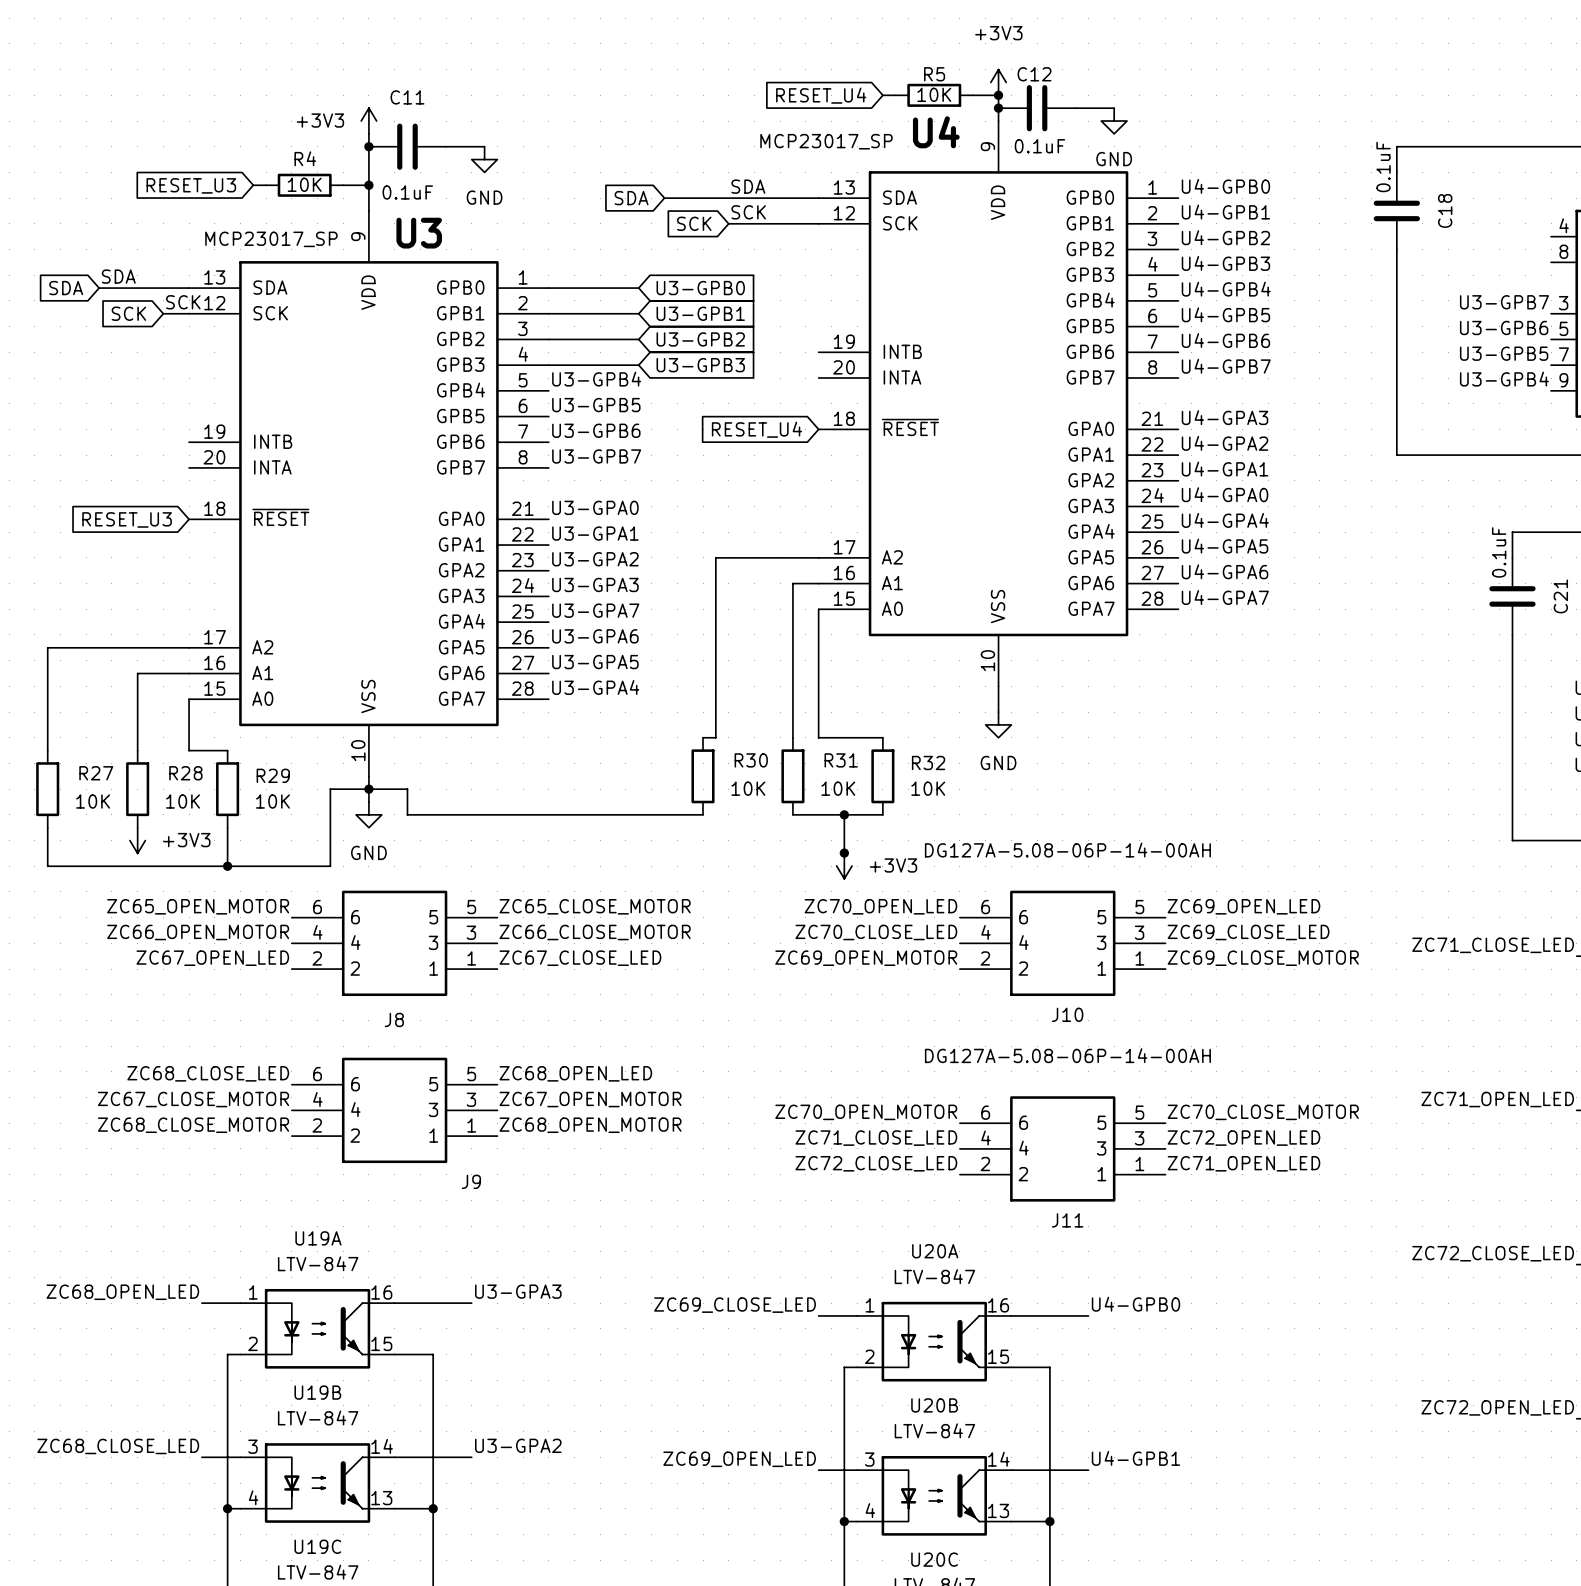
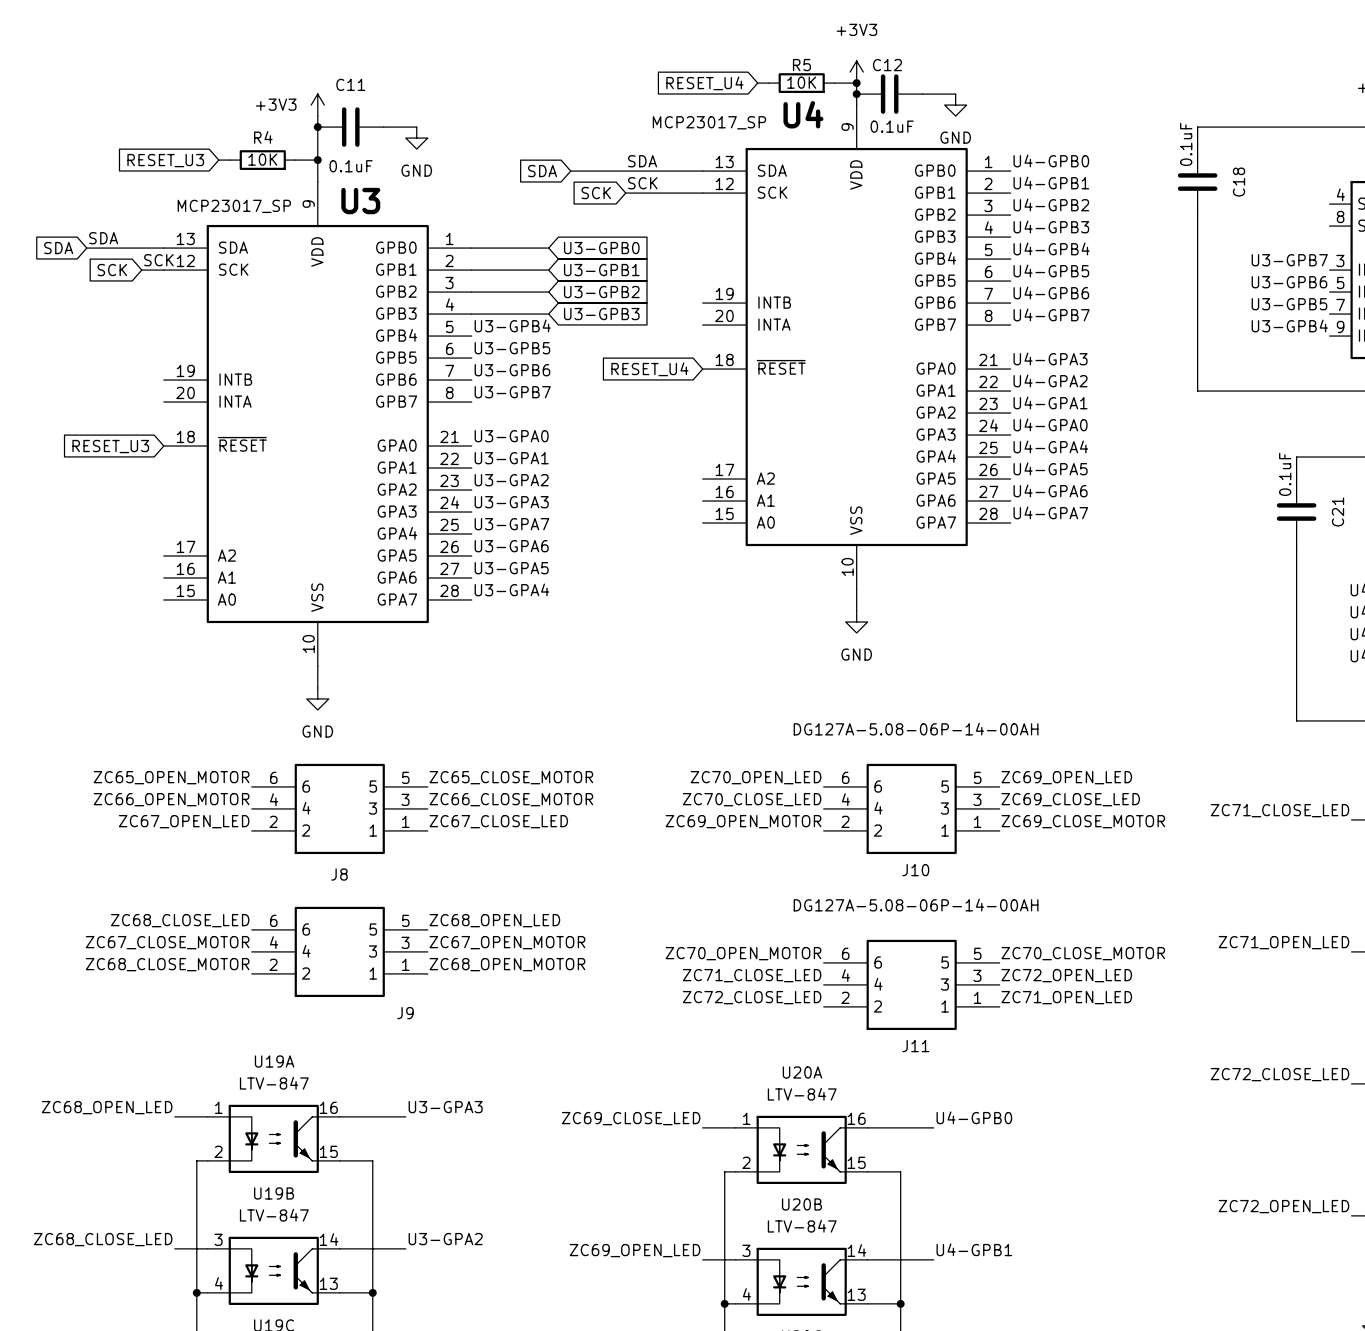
wire: (818, 557) (715, 557) (715, 737) (703, 737) -> none
wire: (818, 583) (792, 583) (792, 737) -> none
wire: (818, 609) (818, 737) (882, 737) -> none
wire: (189, 647) (47, 647) (47, 750) -> none
wire: (189, 673) (137, 673) (137, 750) -> none
wire: (189, 699) (189, 750) (227, 750) -> none
R30: 10K (703, 776) -> none
R31: 10K (792, 776) -> none
R32: 10K (882, 776) -> none
R27: 10K (47, 789) -> none
R28: 10K (137, 789) -> none
R29: 10K (227, 789) -> none
junction: (368, 789) -> none
wire: (703, 814) (407, 814) (407, 789) (330, 789) (330, 866) (47, 866) (47, 827) -> none
wire: (792, 814) (882, 814) -> none
wire: (844, 814) (844, 853) -> none
junction: (844, 814) -> none
wire: (227, 827) (227, 866) -> none
power symbol: +3V3 (137, 840) -> none
junction: (844, 853) -> none
power symbol: +3V3 (844, 865) -> none
junction: (227, 866) -> none

